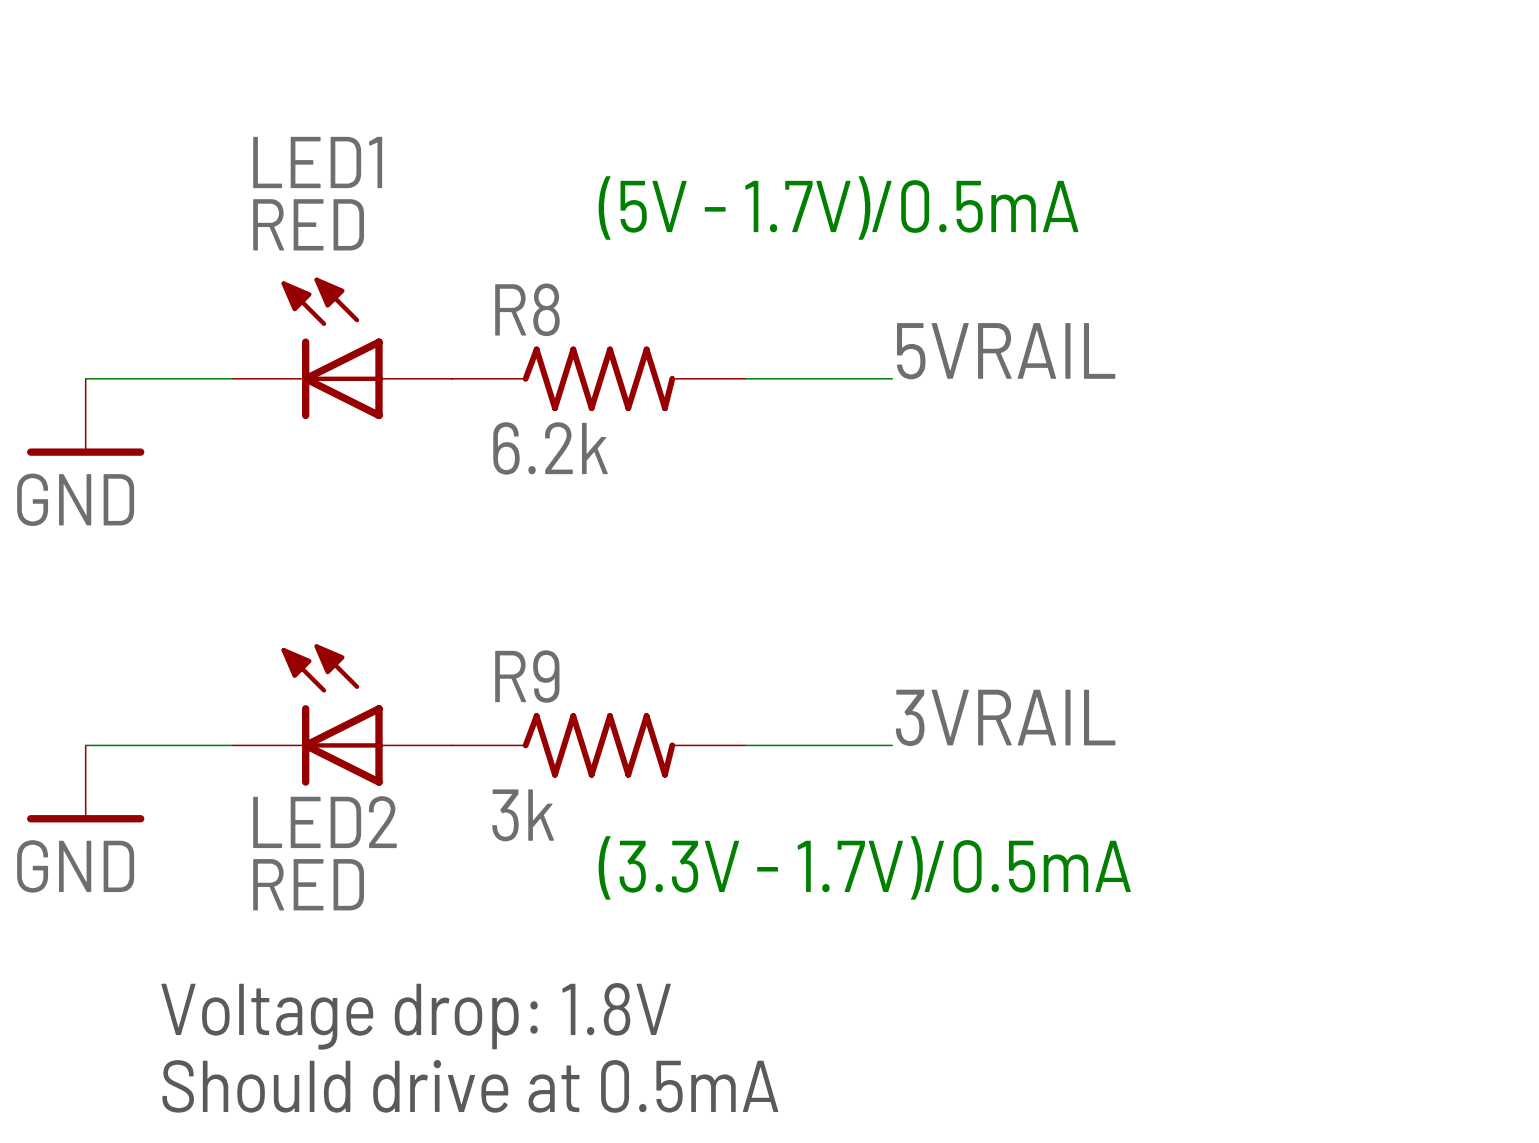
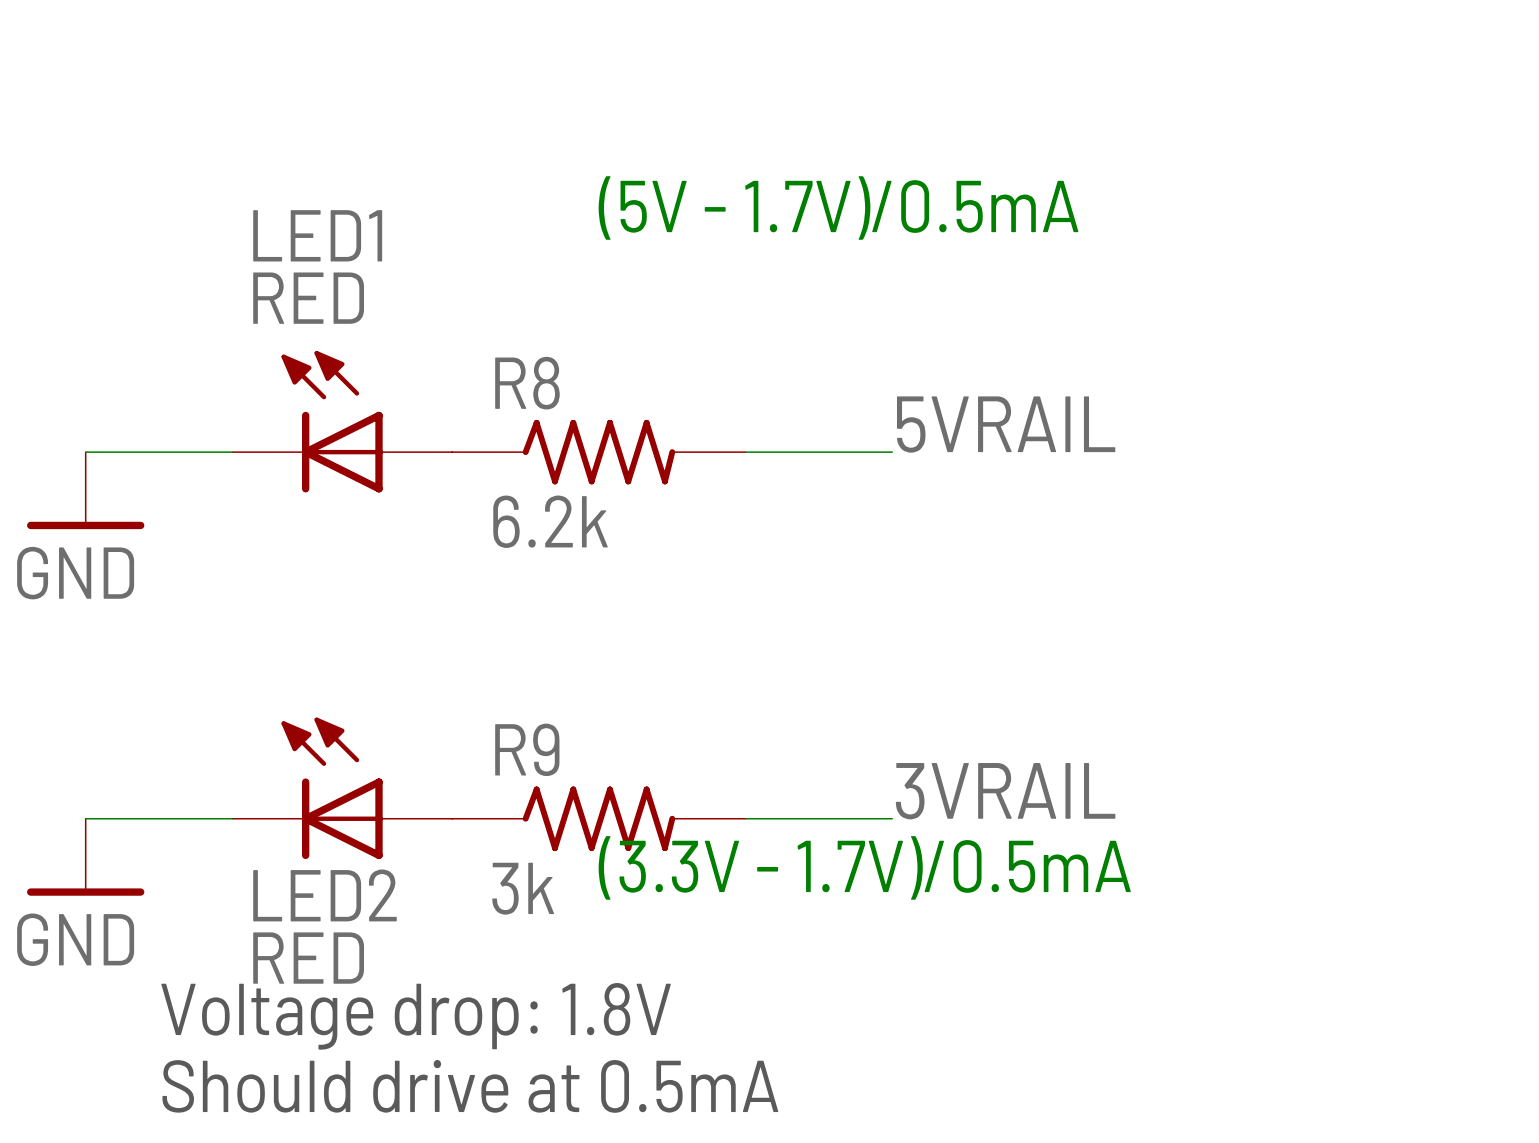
LED1 position: (342, 348) -> (342, 421)
label position: 5VRAIL (1006, 351) -> 5VRAIL (1006, 424)
wire: (85, 378) (232, 378) -> (85, 452) (232, 452)
R8 position: (598, 378) -> (598, 452)
wire: (745, 378) (892, 378) -> (745, 452) (892, 452)
power symbol position: GND (85, 417) -> GND (85, 490)
LED2 position: (342, 714) -> (342, 788)
label position: 3VRAIL (1005, 717) -> 3VRAIL (1005, 791)
wire: (85, 745) (232, 745) -> (85, 818) (232, 818)
R9 position: (598, 745) -> (598, 818)
wire: (745, 745) (892, 745) -> (745, 818) (892, 818)
power symbol position: GND (85, 783) -> GND (85, 857)

